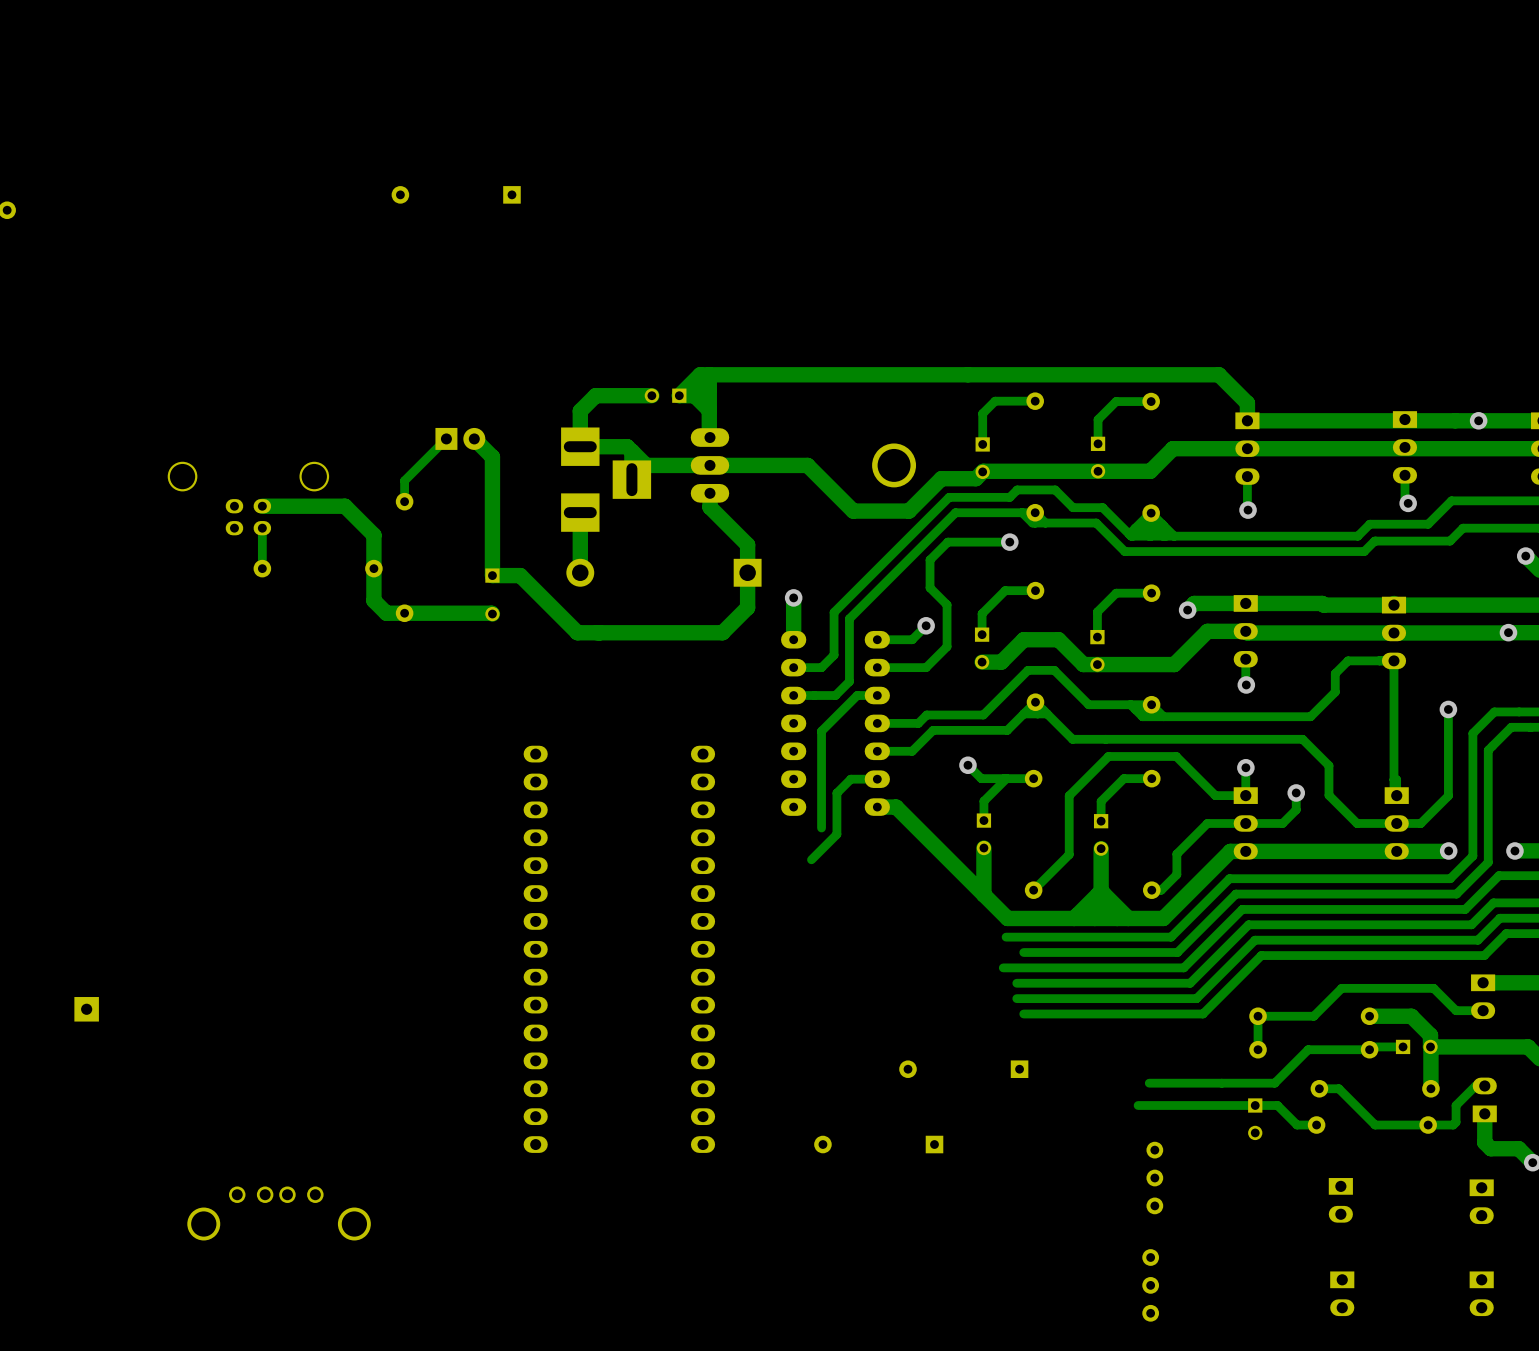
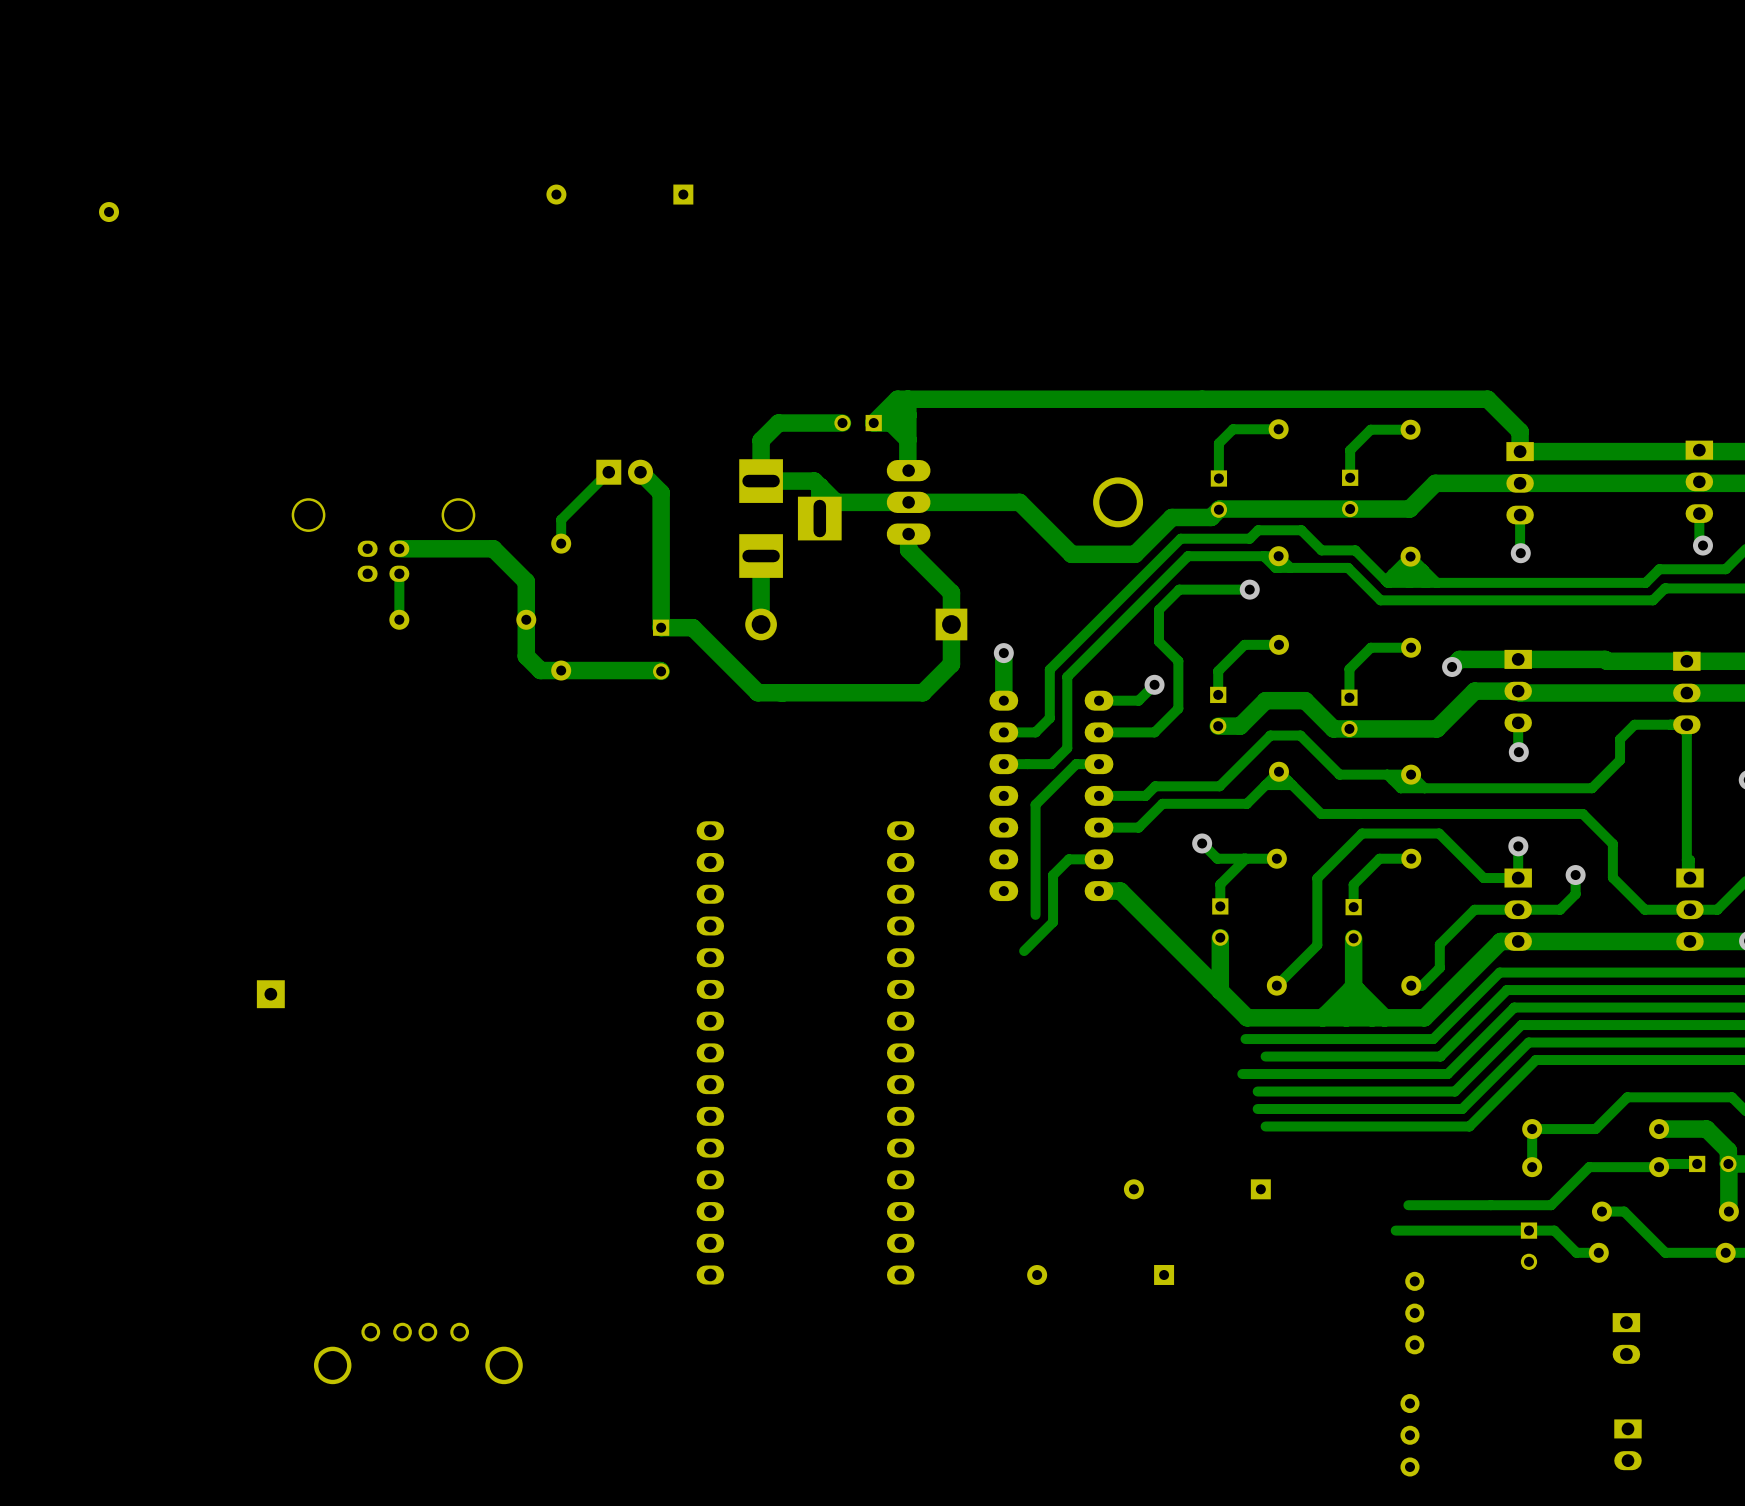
part position: (86, 1009) -> (270, 994)

